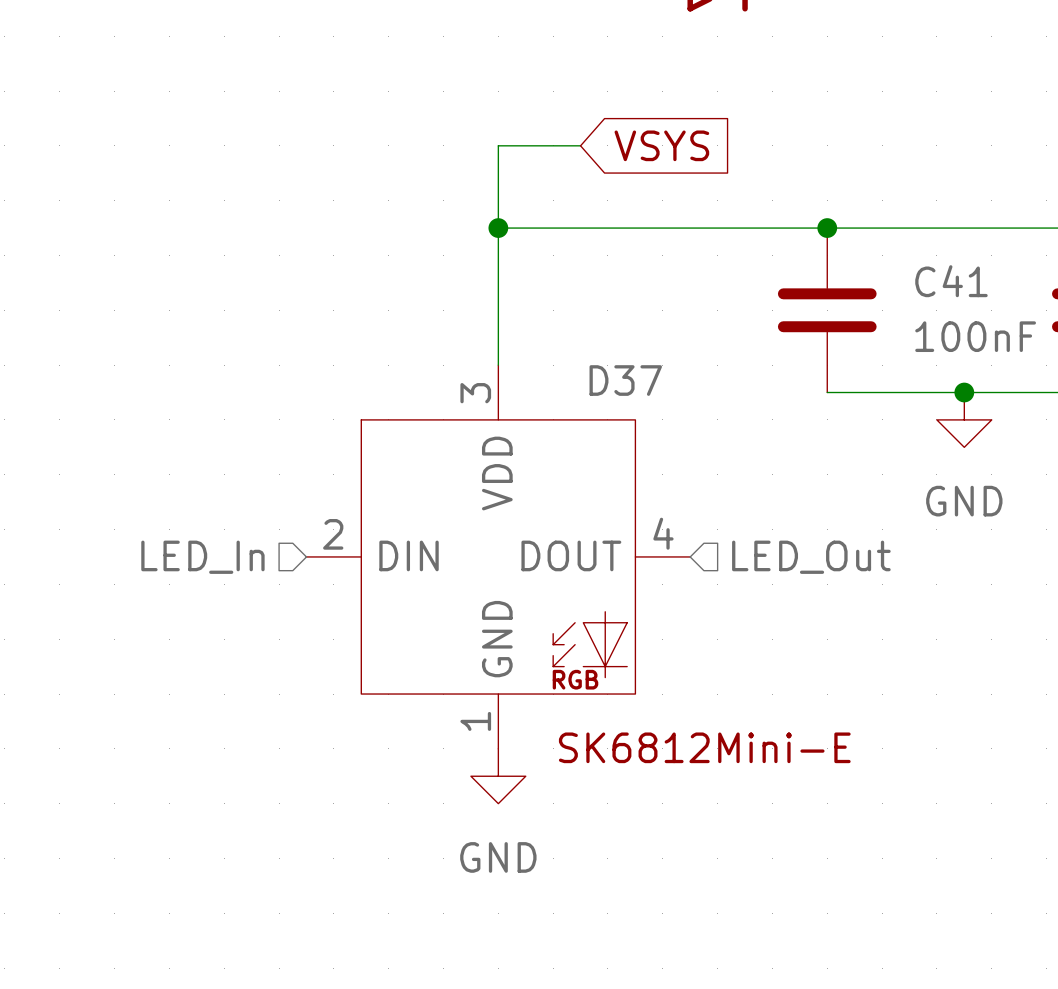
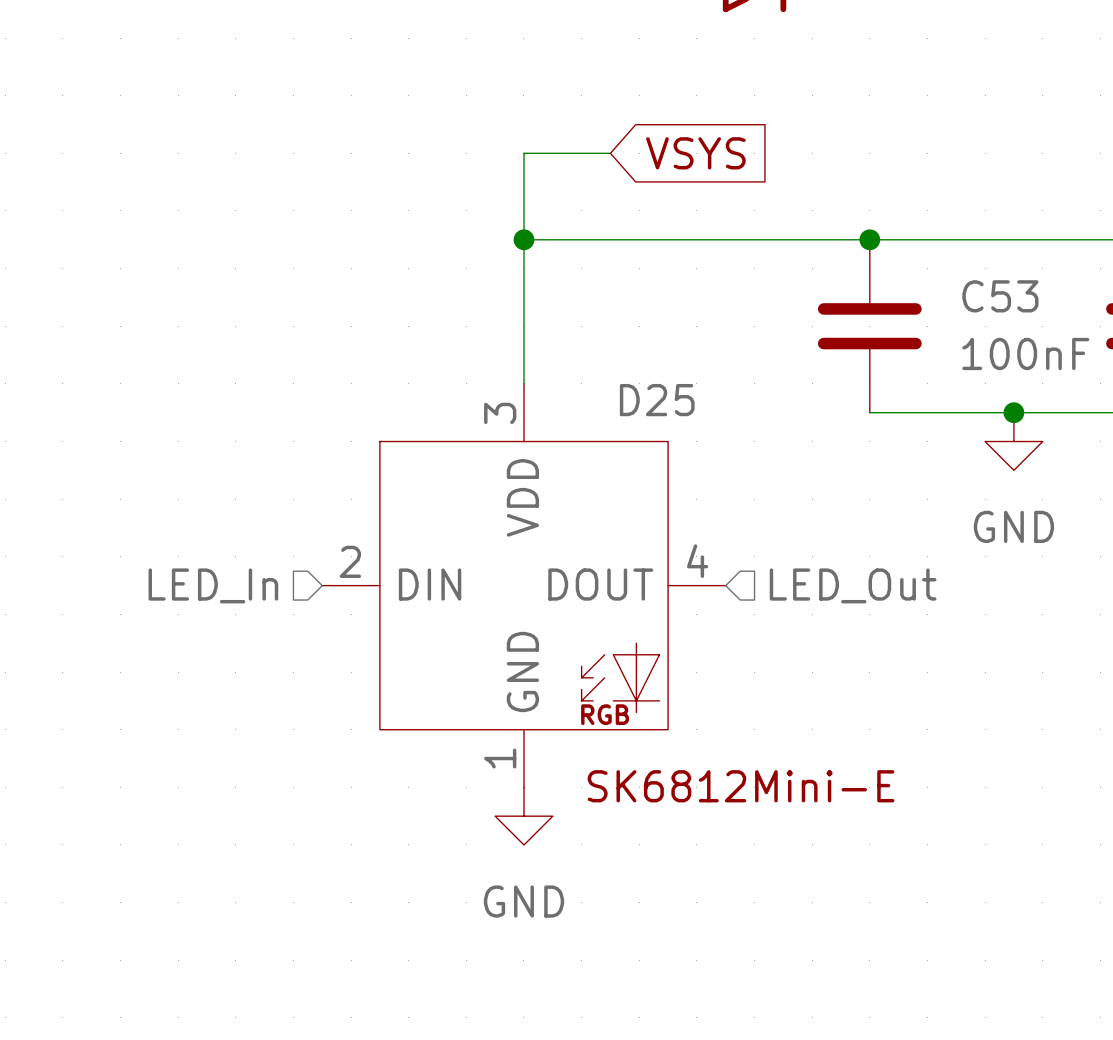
C41 name: C41 (951, 281) -> C53 (1000, 296)
D37 name: D37 (625, 380) -> D25 (657, 400)

